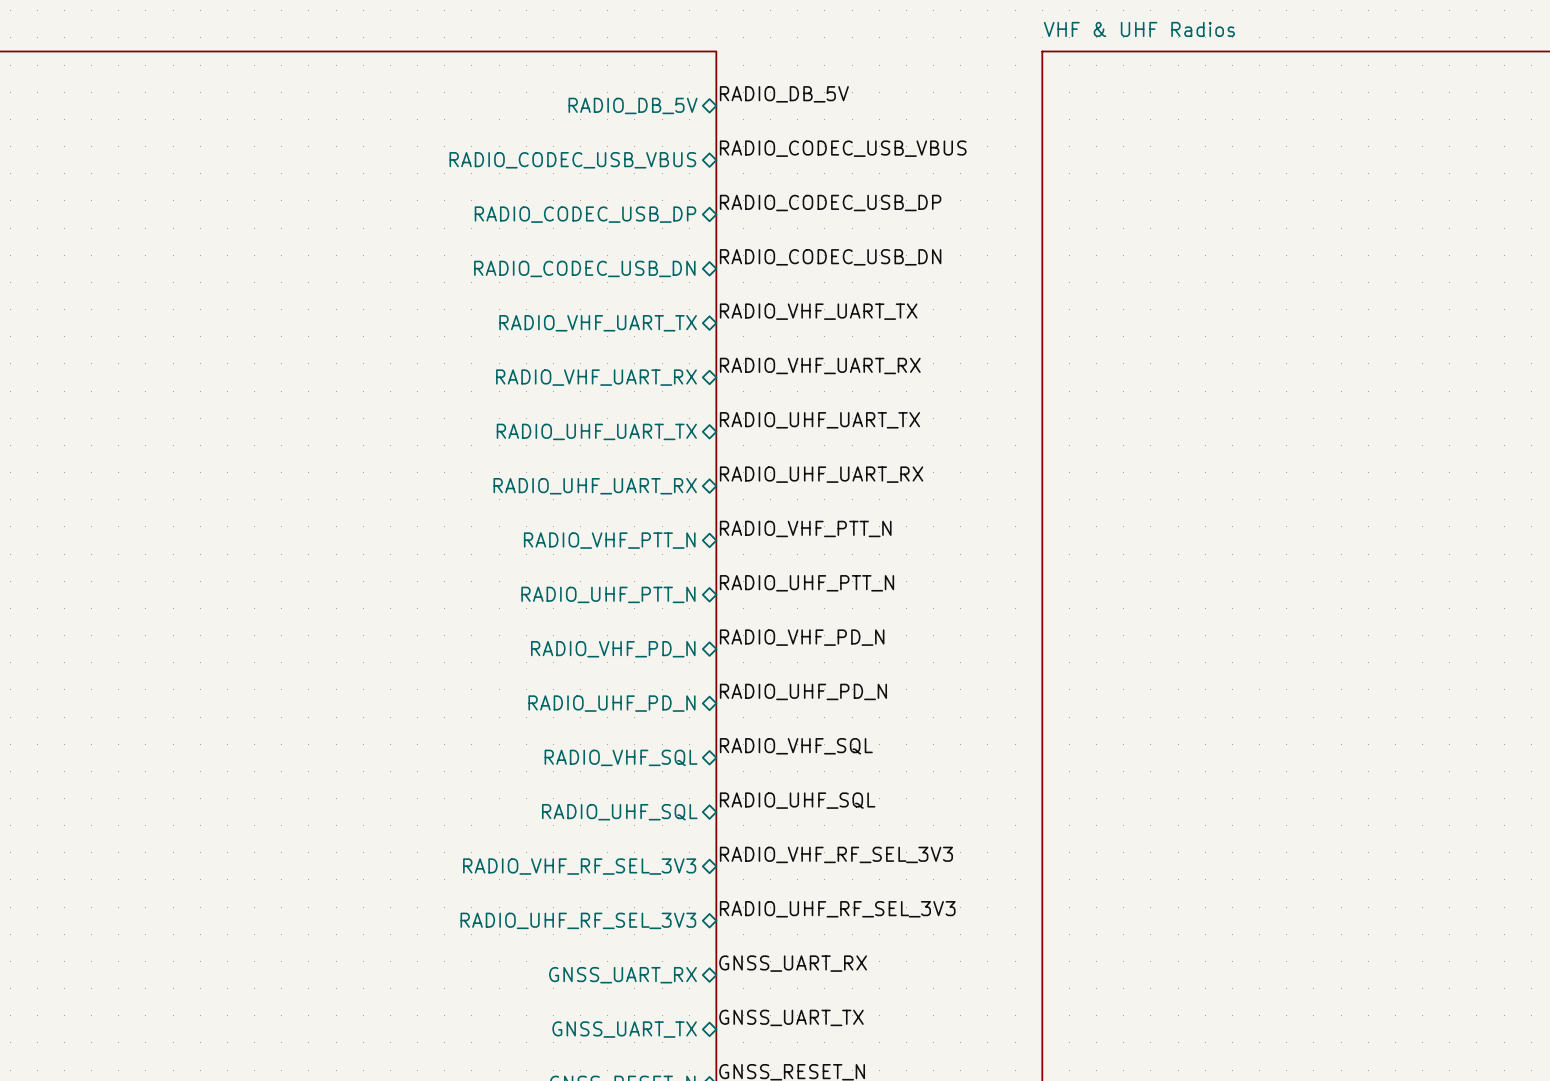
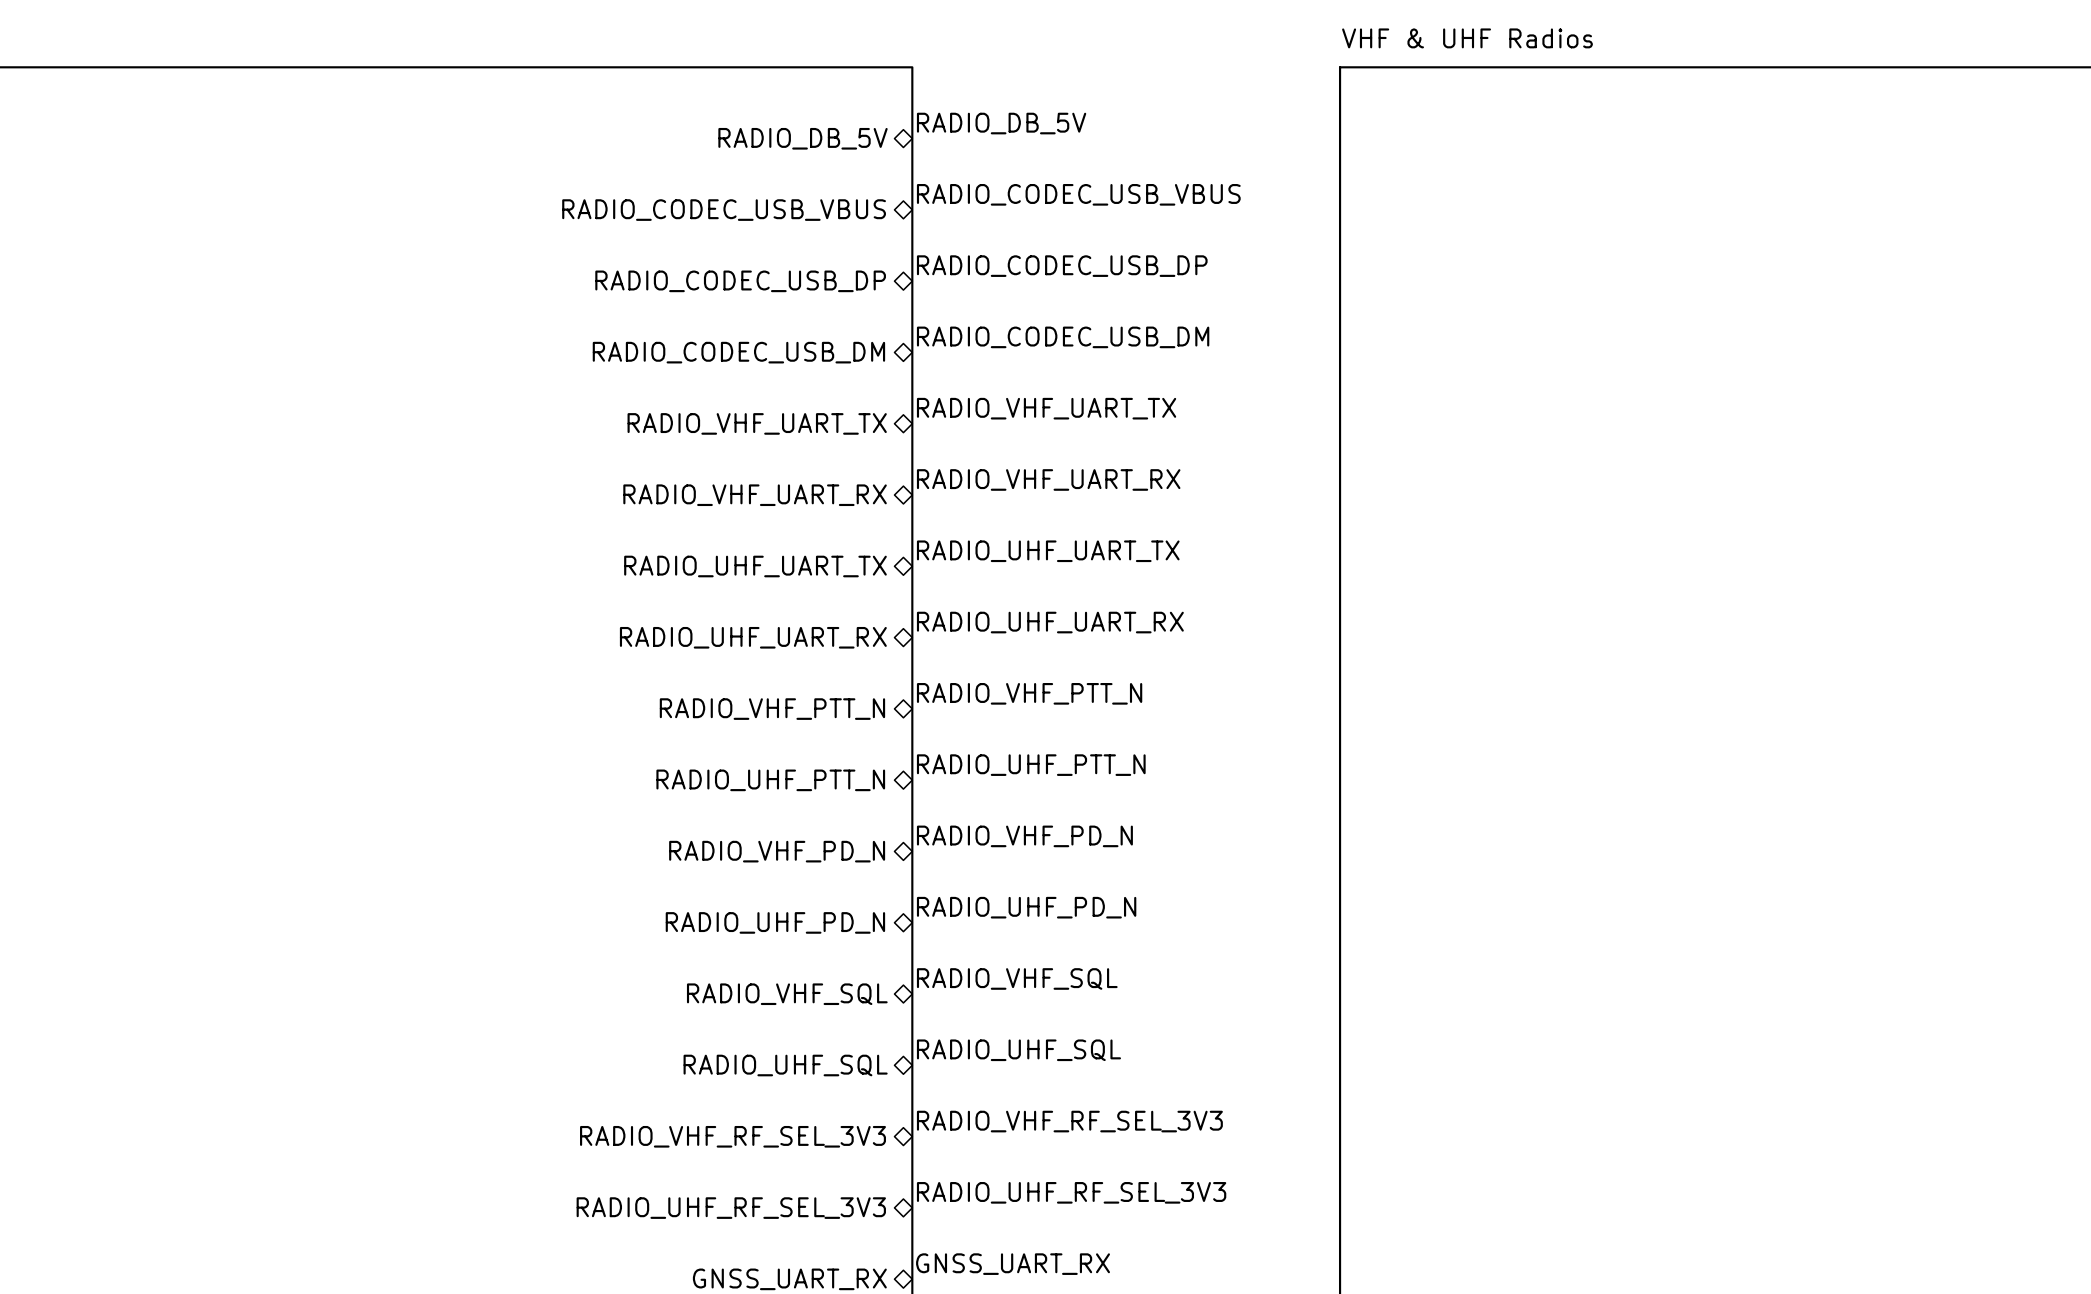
label: RADIO_CODEC_USB_DN (830, 257) -> RADIO_CODEC_USB_DM (1063, 337)
sheet pin: RADIO_CODEC_USB_DN (584, 268) -> RADIO_CODEC_USB_DM (738, 352)

